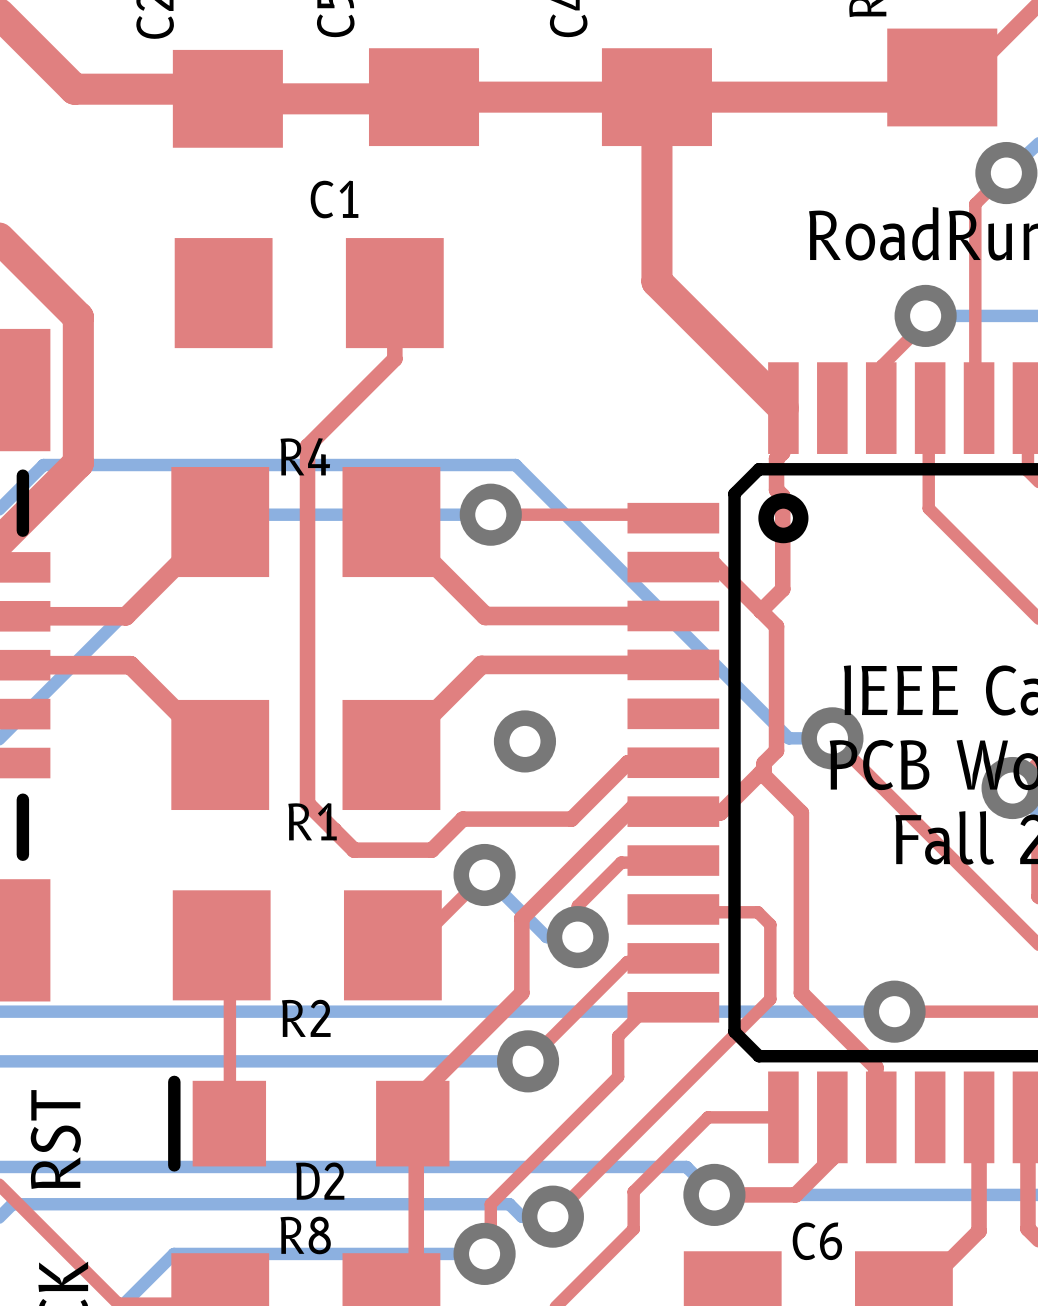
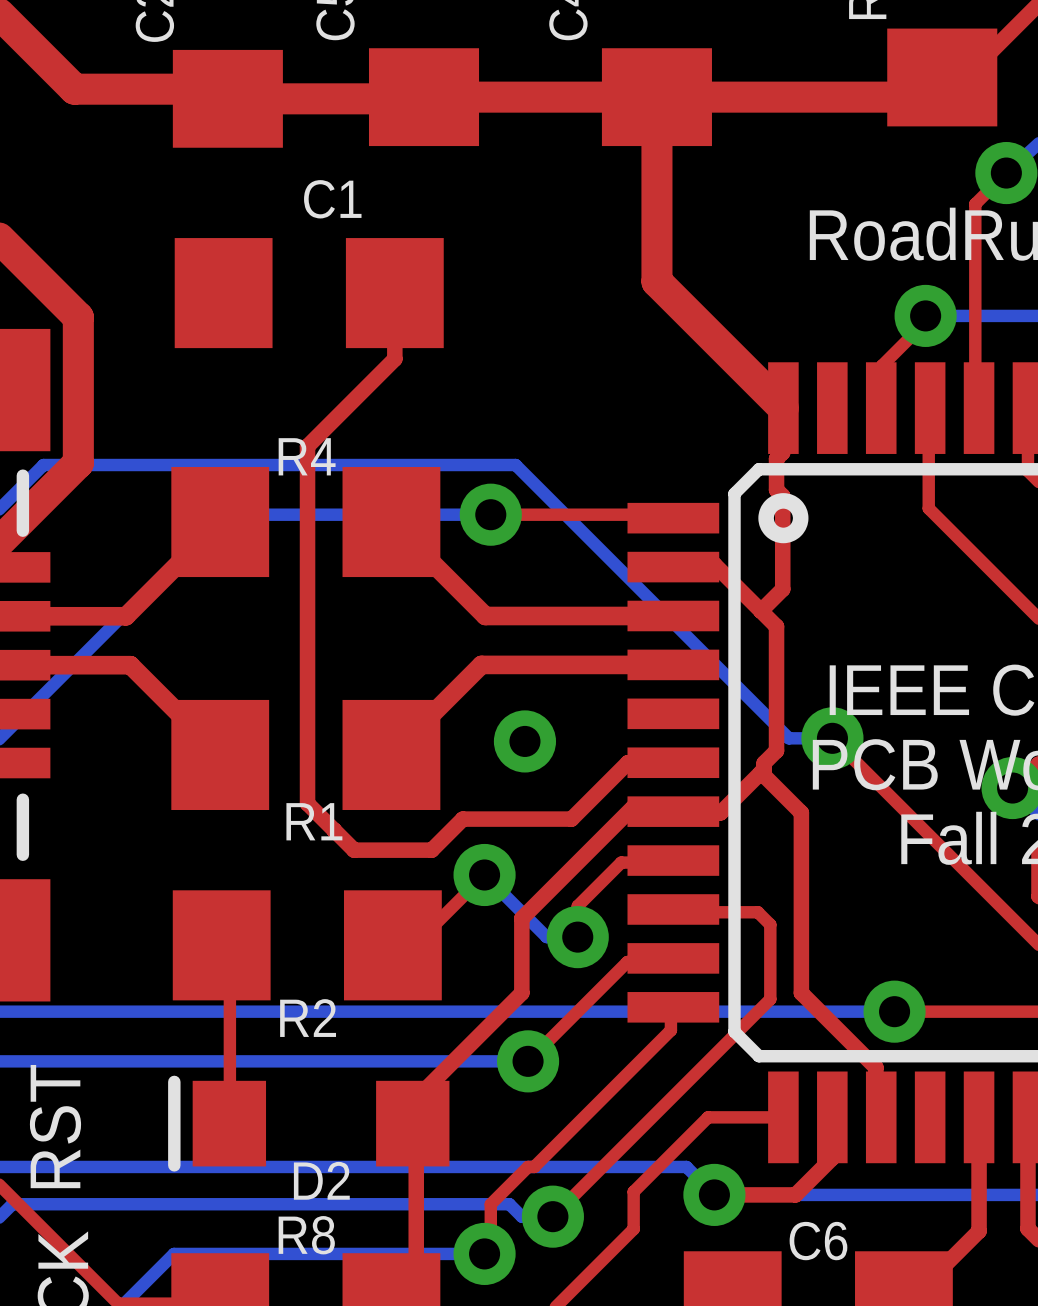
top track: (673, 1007) (647, 1007) (618, 1036) (618, 1076) (528, 1166) -> (673, 1007) (670, 1011) (670, 1030) (534, 1166) (528, 1166)

